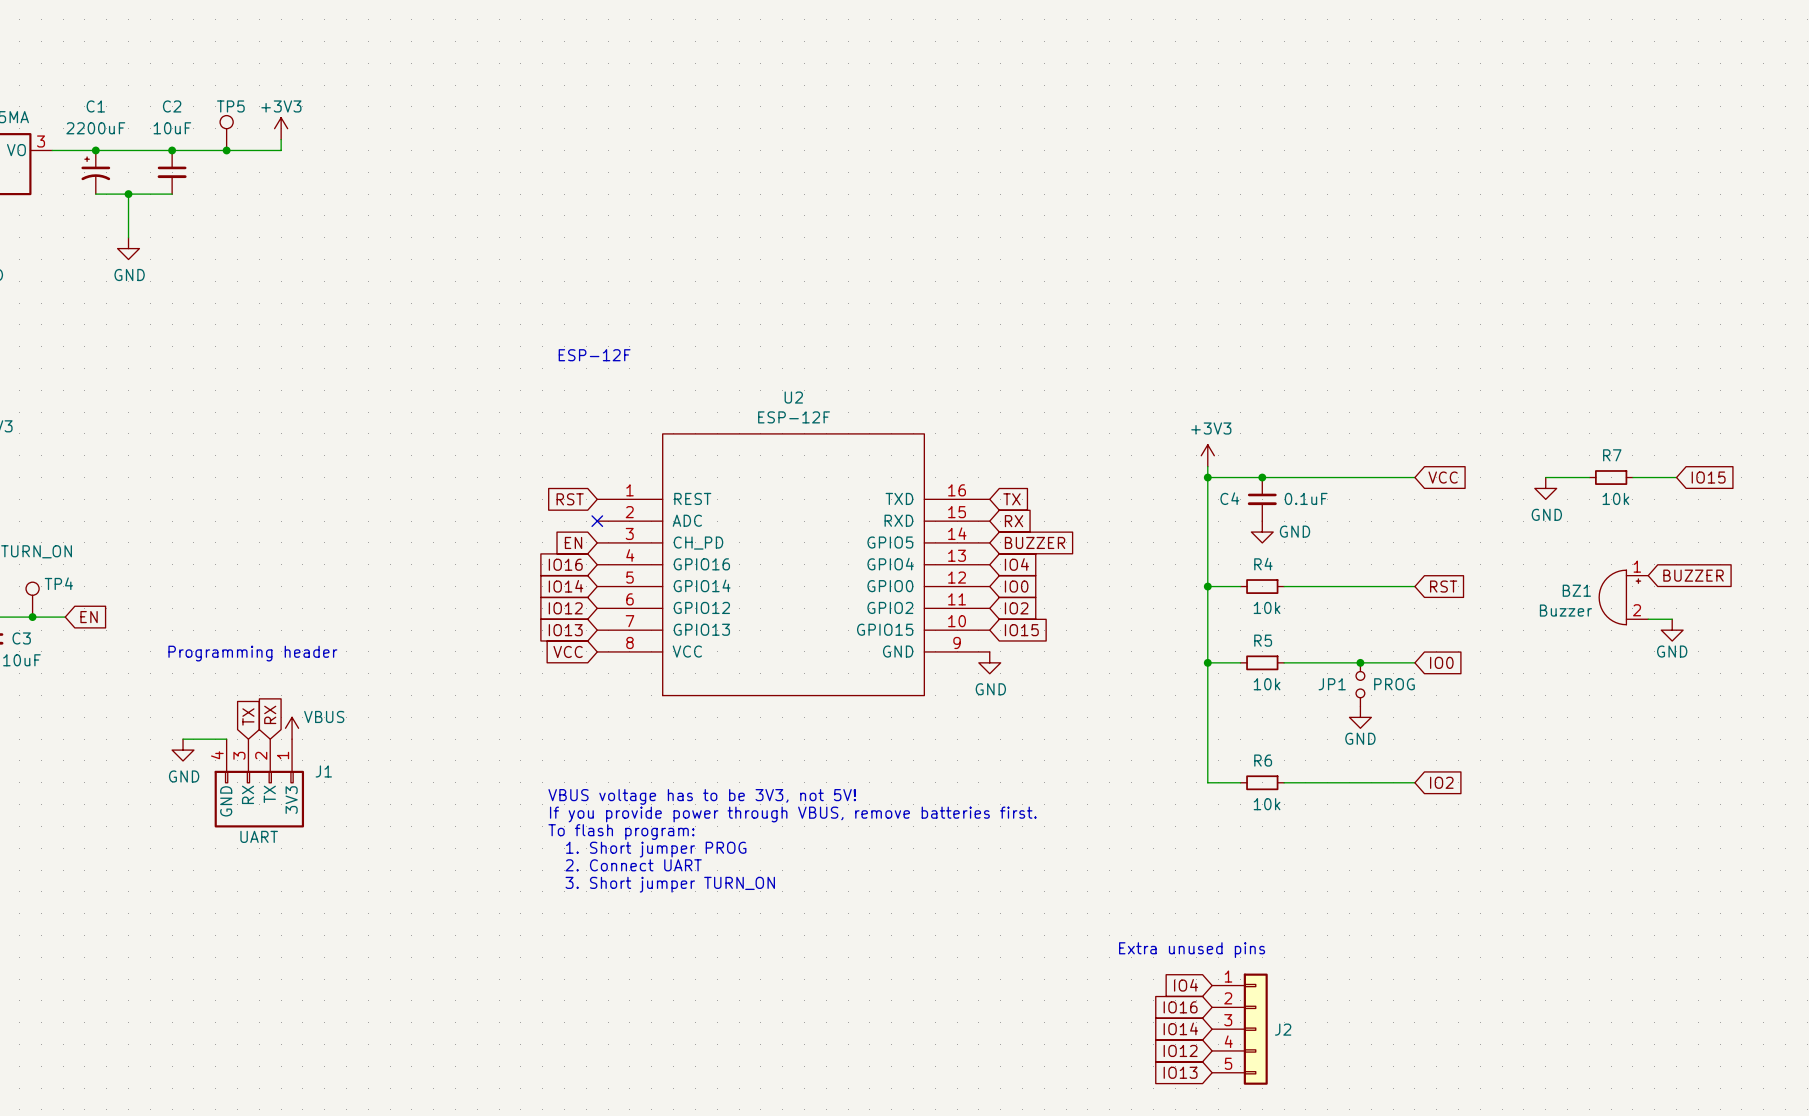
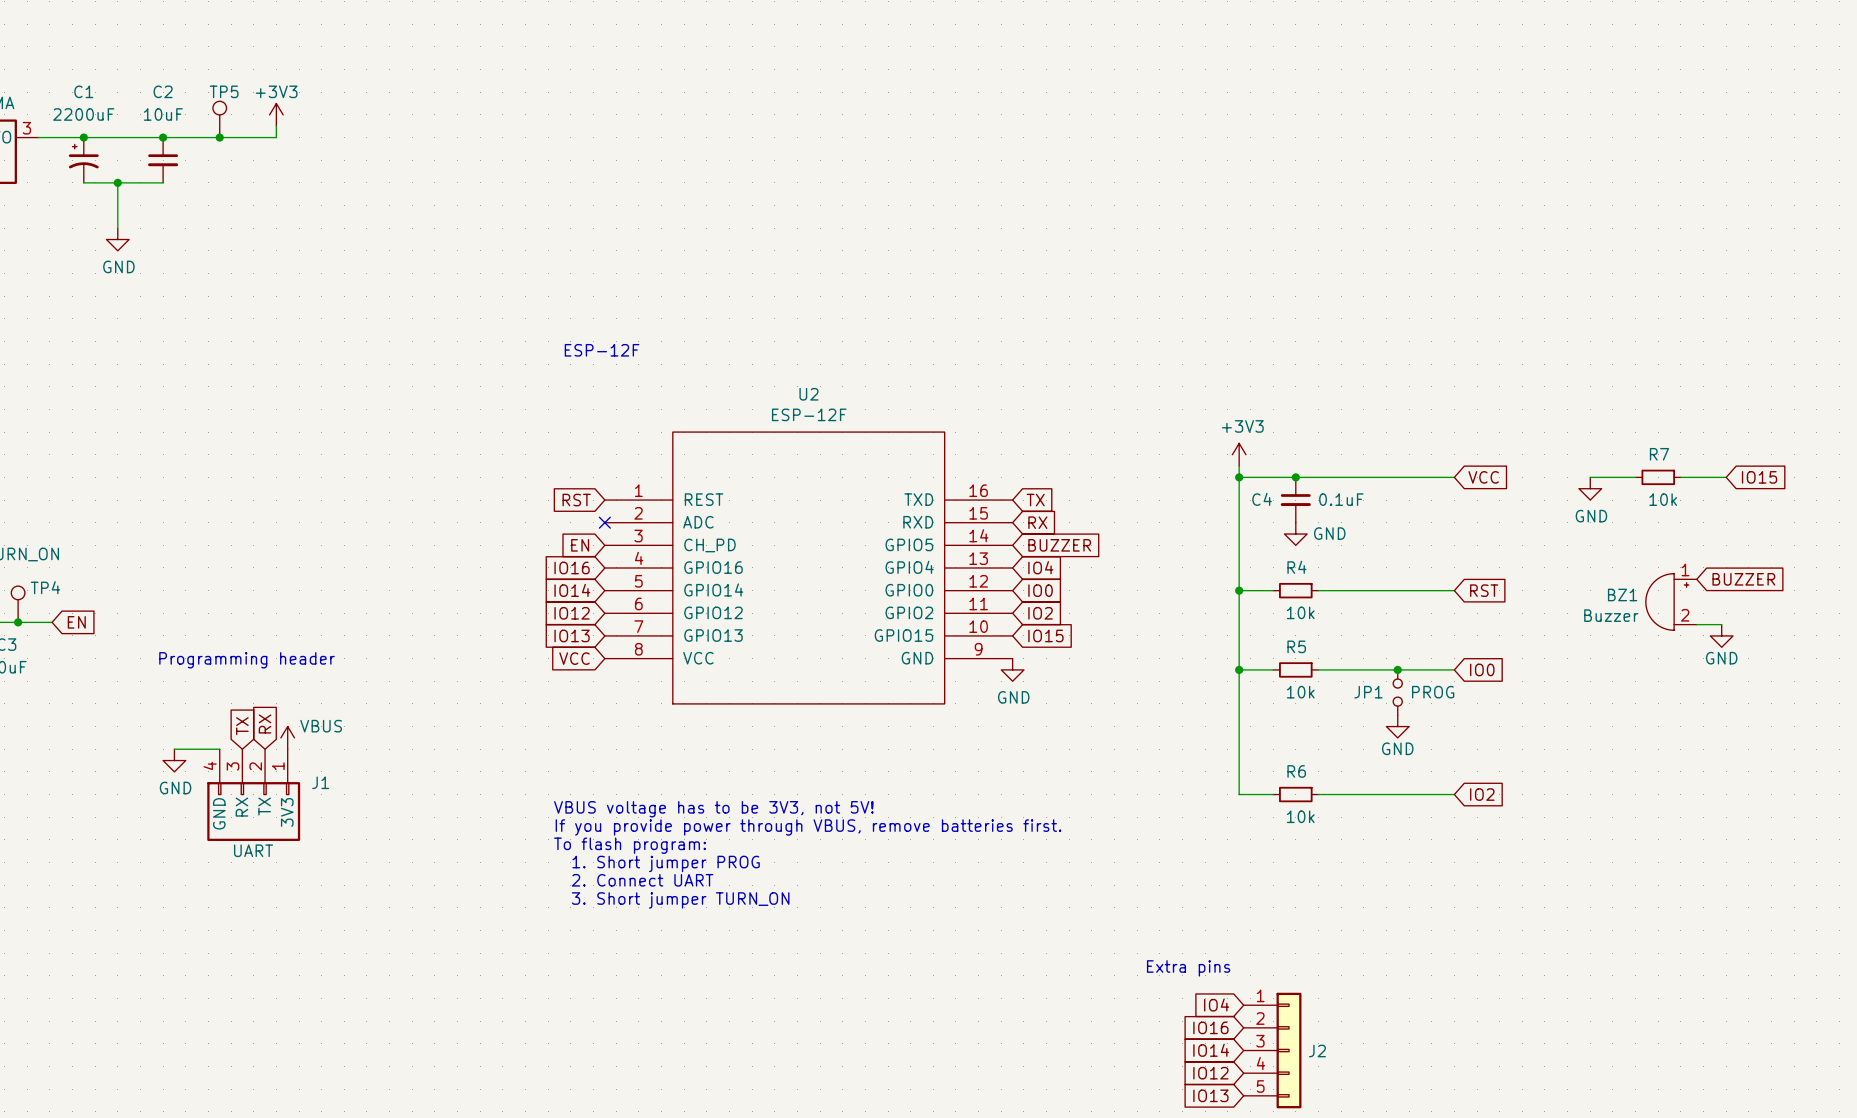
text: Extra unused pins (1192, 950) -> Extra pins (1188, 968)

